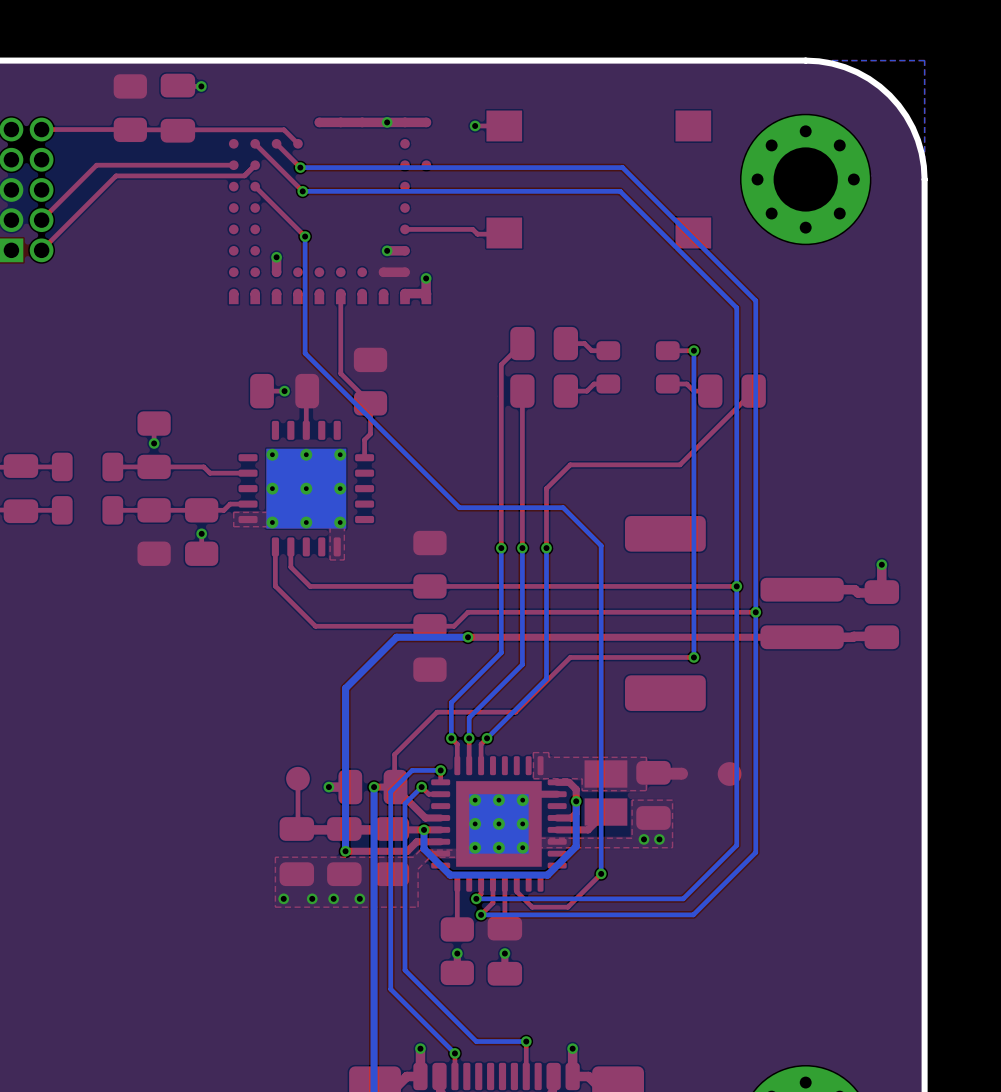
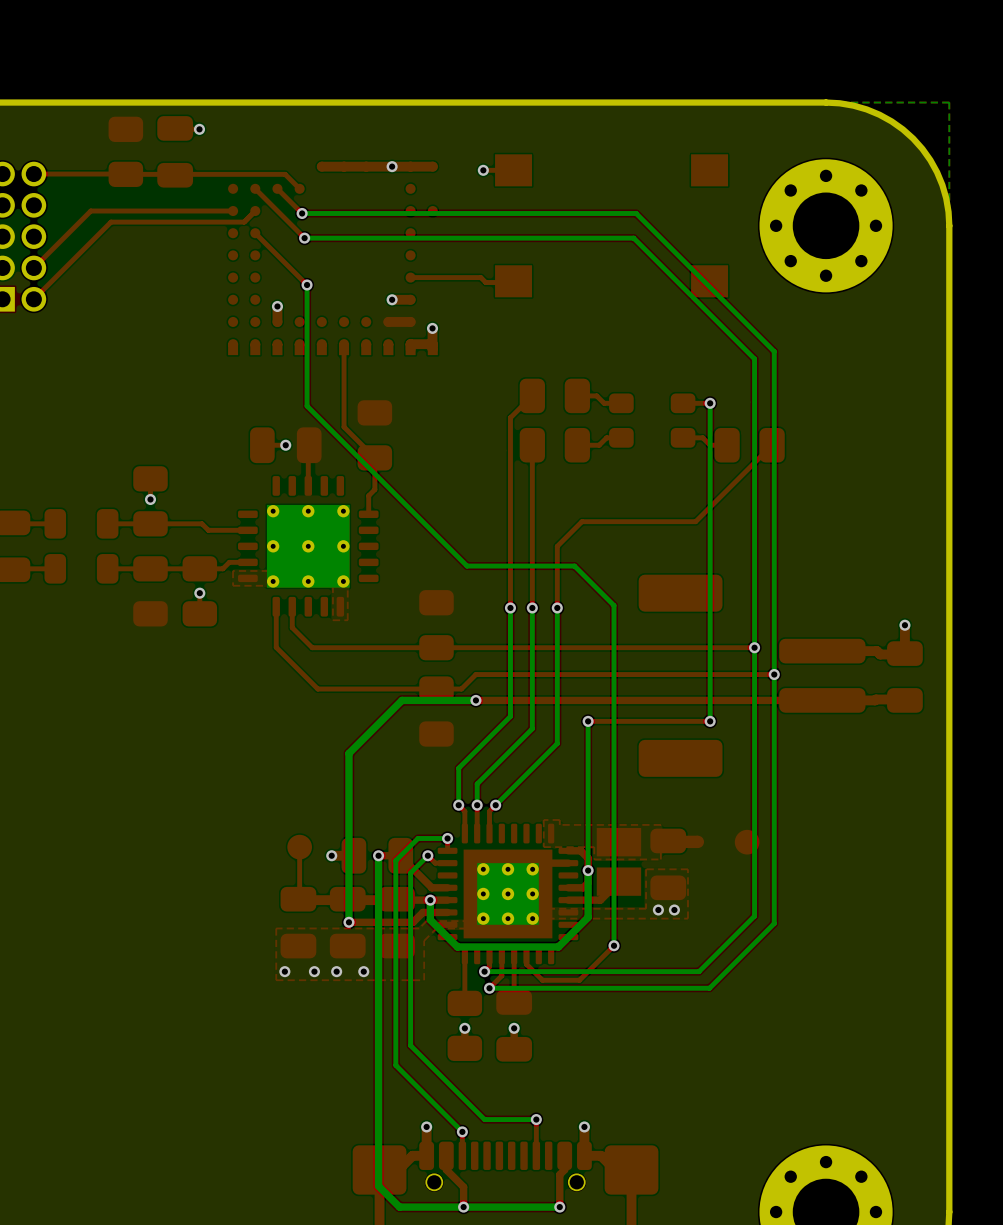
top track: (576, 657) (570, 657) (515, 712) (437, 712) (394, 754) (394, 787) -> none
bottom track: none -> (588, 721) (588, 870)
via: none -> (588, 721)

